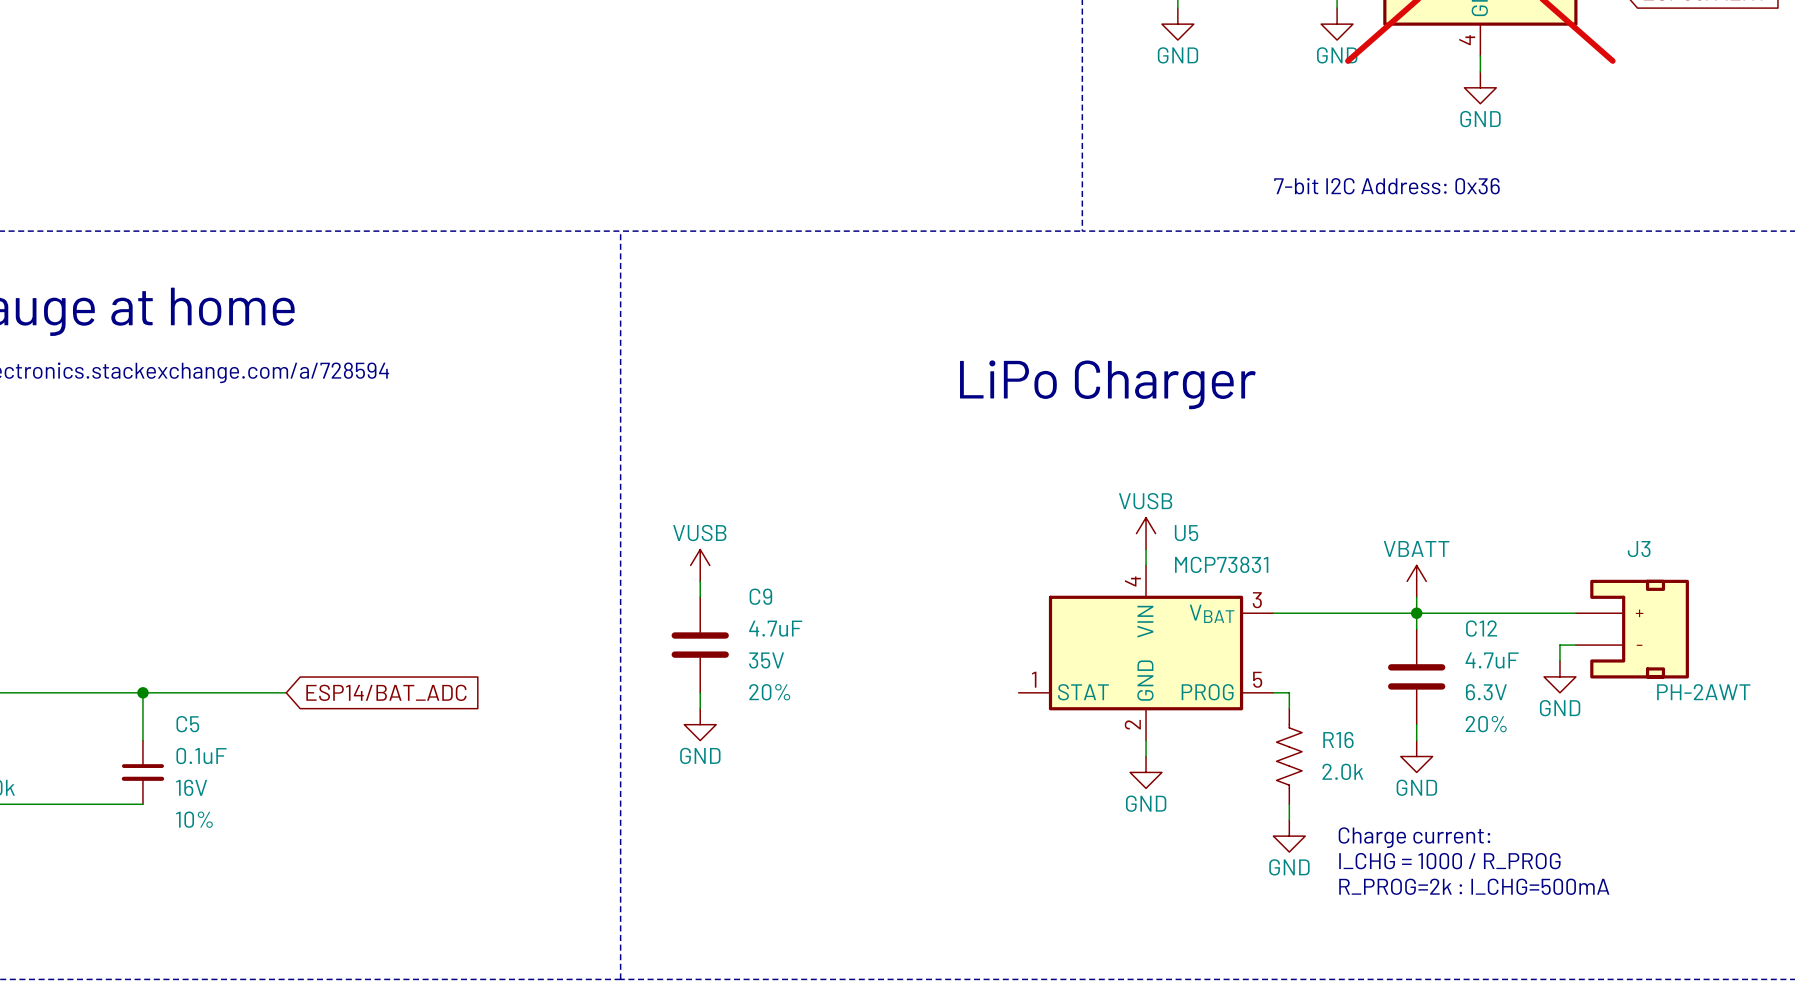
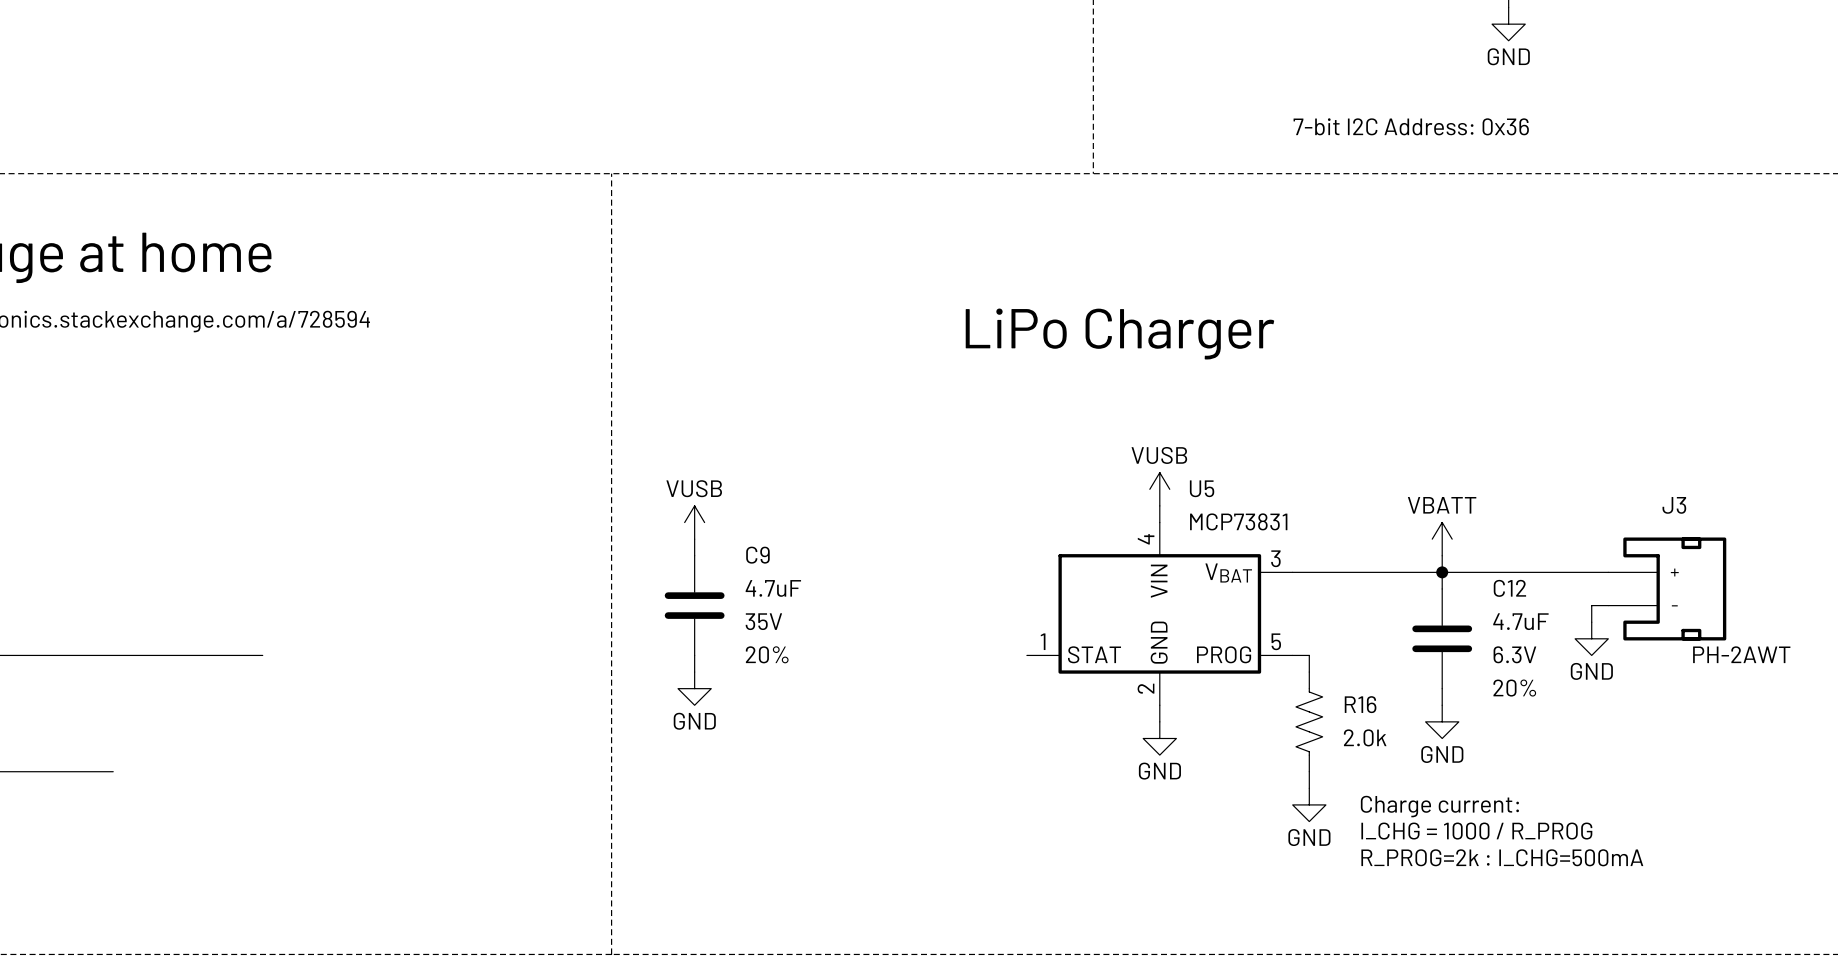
wire: (142, 692) (142, 740) -> none
junction: (142, 692) -> none
global label: ESP14/BAT_ADC (386, 692) -> none
C5: 0.1uF (142, 772) -> none

